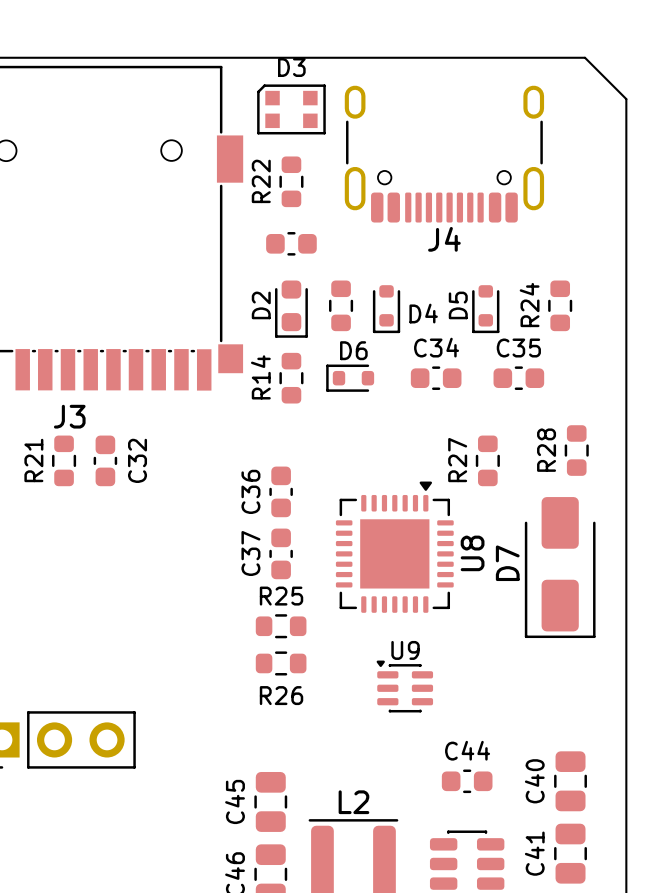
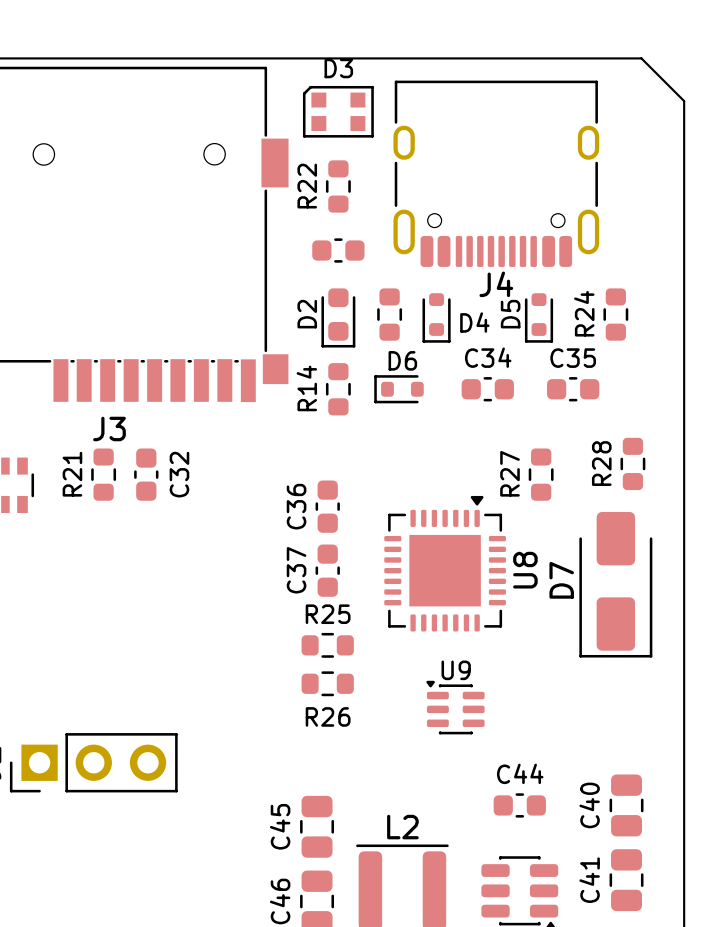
J4 footprint: [344, 85, 545, 223] -> [393, 80, 600, 267]

